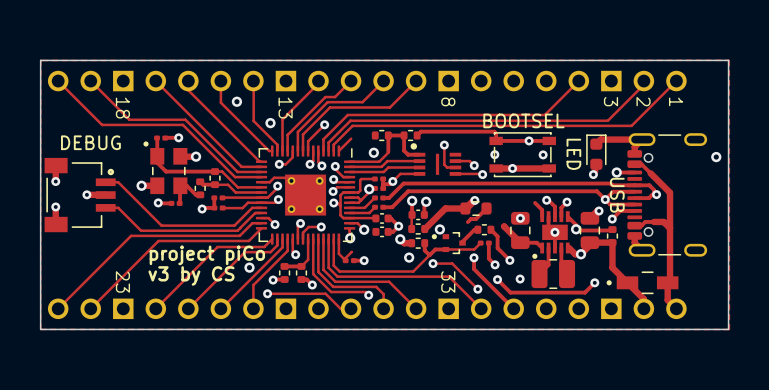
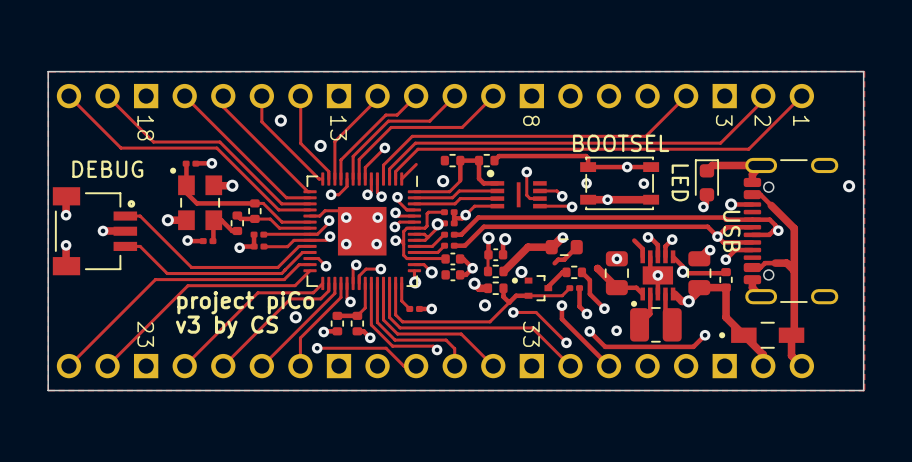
part footprint: [255, 145, 356, 245] -> [303, 172, 422, 291]
via: none -> (346, 217)
via: none -> (377, 217)
via: none -> (346, 244)
via: none -> (376, 244)
track: (351, 252) (345, 260) -> none

